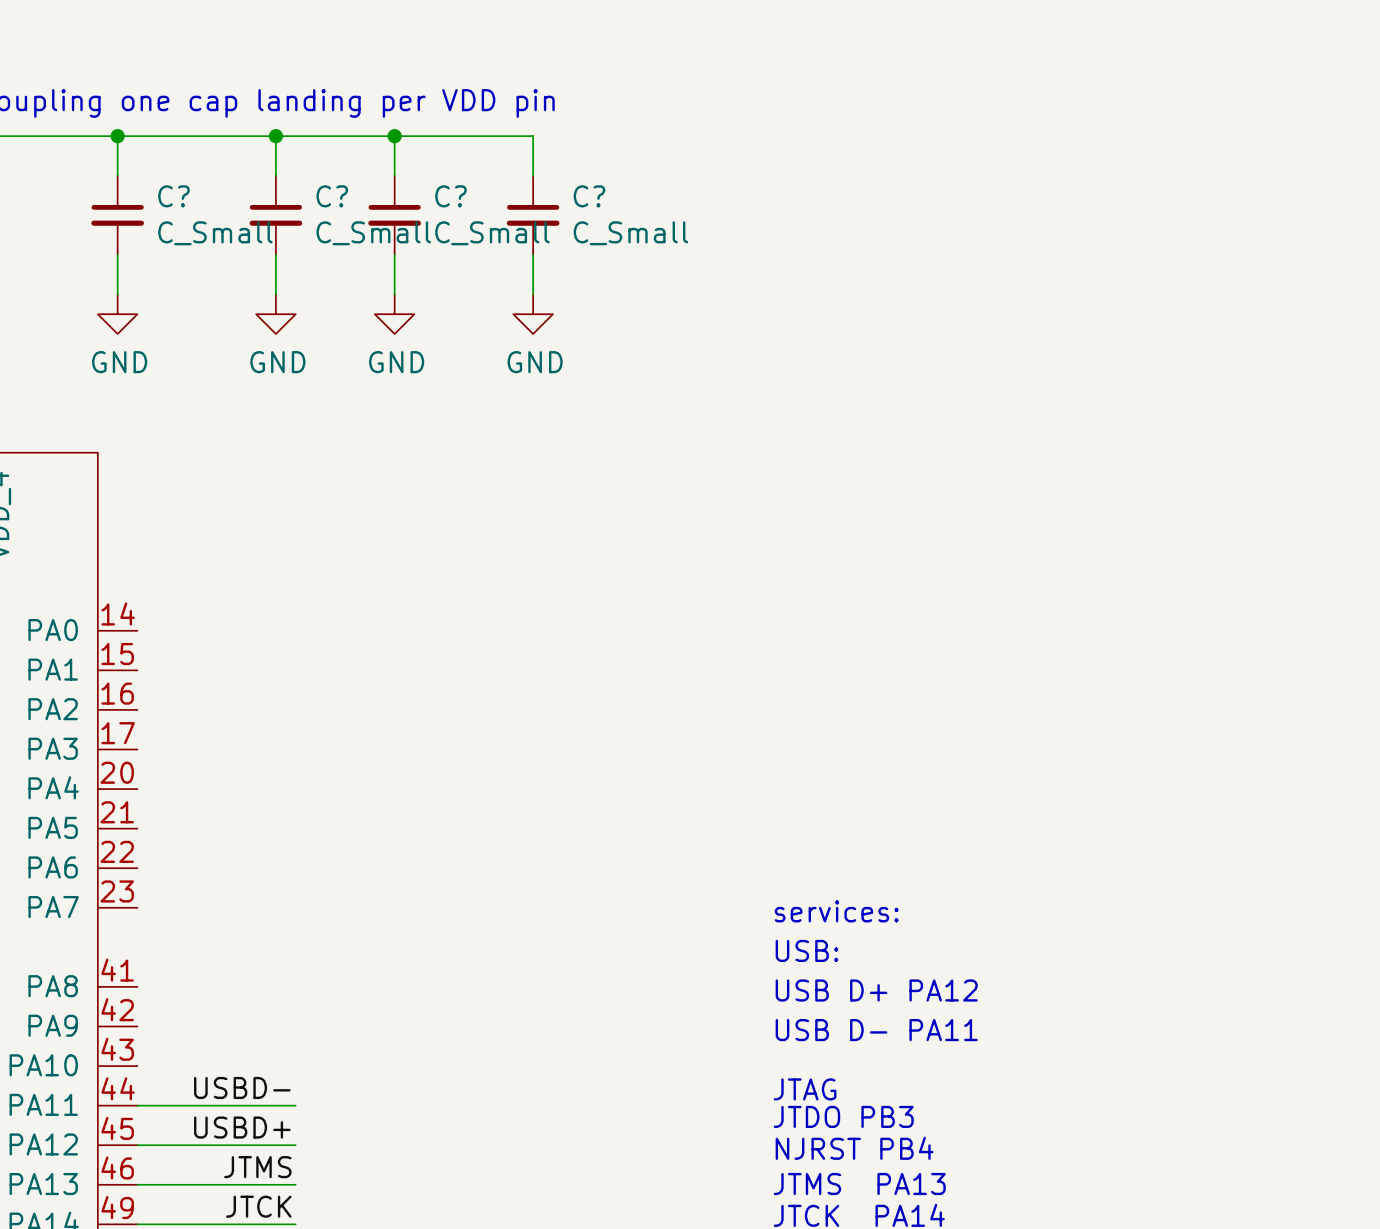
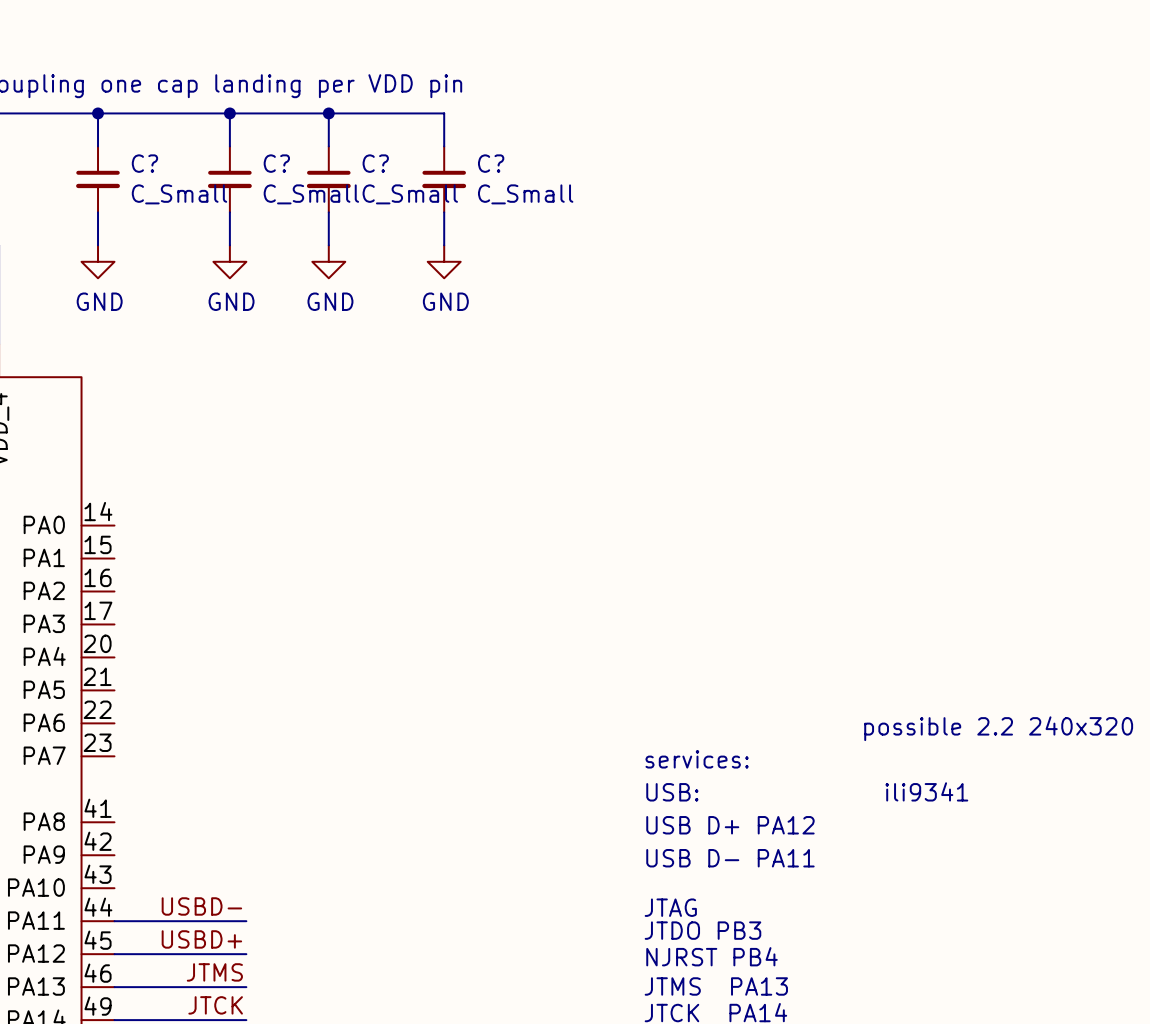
text: none -> possible 2.2 240x320 (998, 728)
text: none -> ili9341 (926, 791)

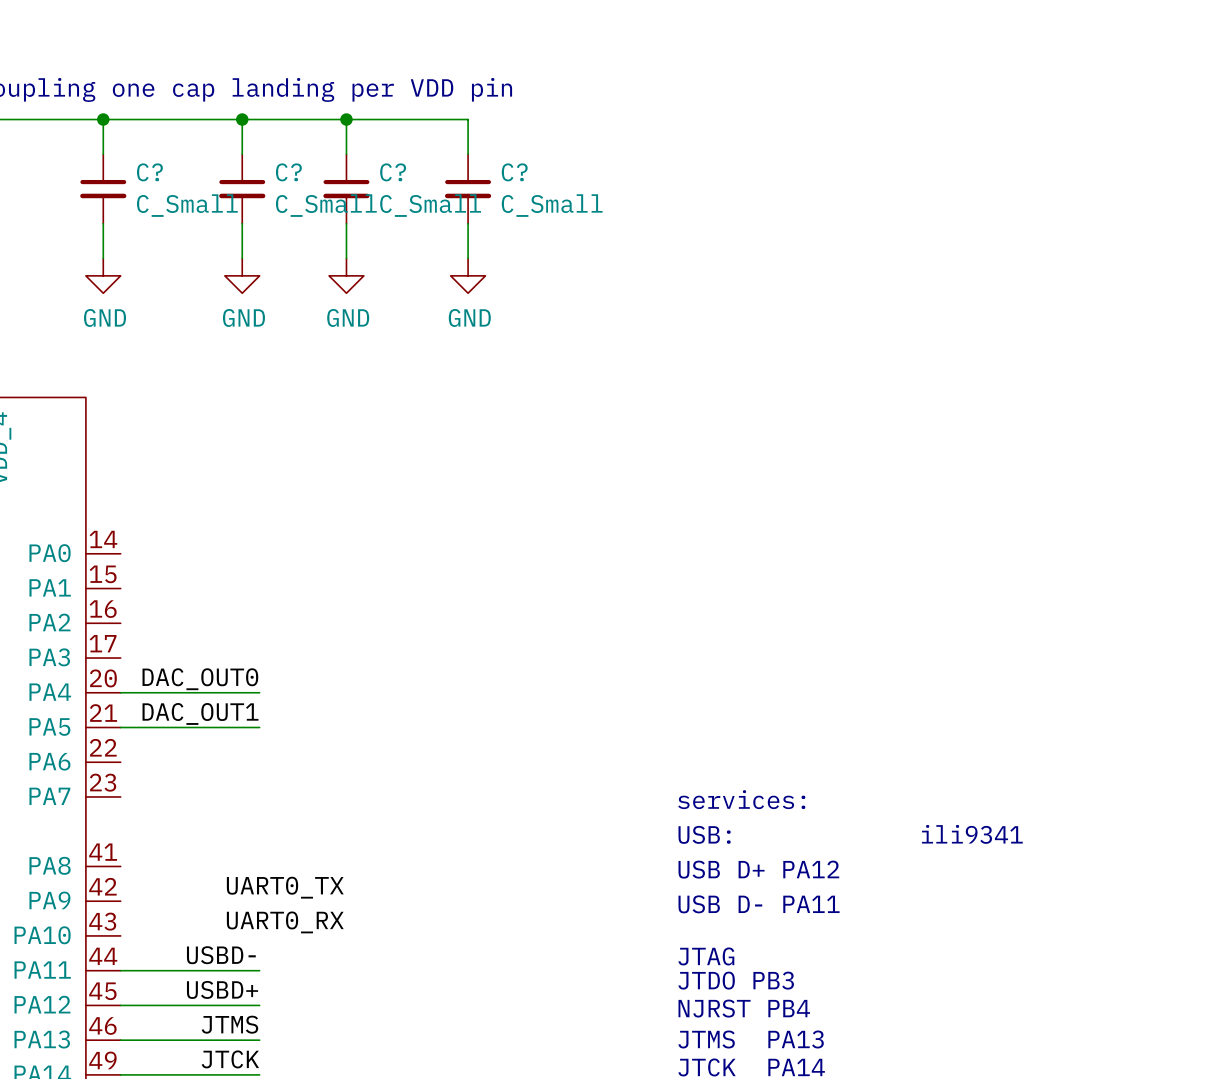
label: none -> DAC_OUT0 (200, 679)
wire: none -> (120, 692) (259, 692)
label: none -> DAC_OUT1 (200, 713)
wire: none -> (120, 727) (259, 727)
text: possible 2.2 240x320 (998, 728) -> none
label: none -> UART0_TX (285, 887)
label: none -> UART0_RX (285, 922)

